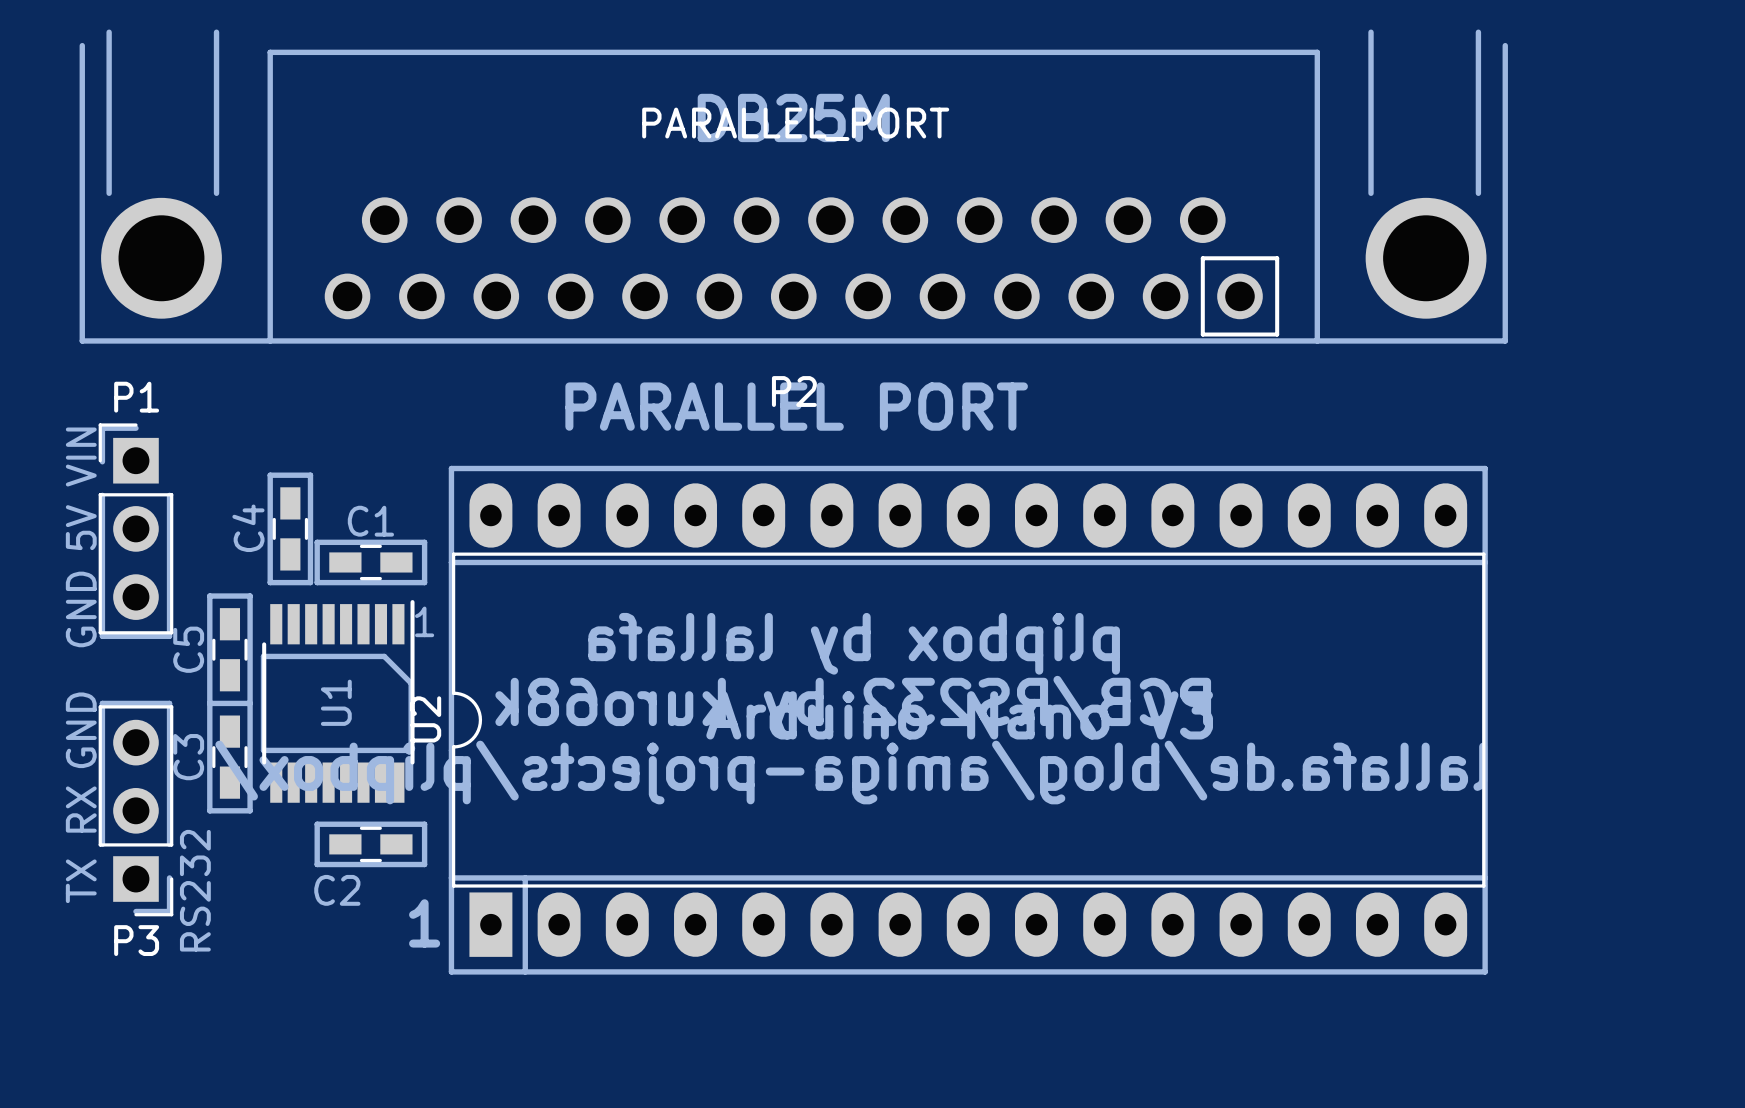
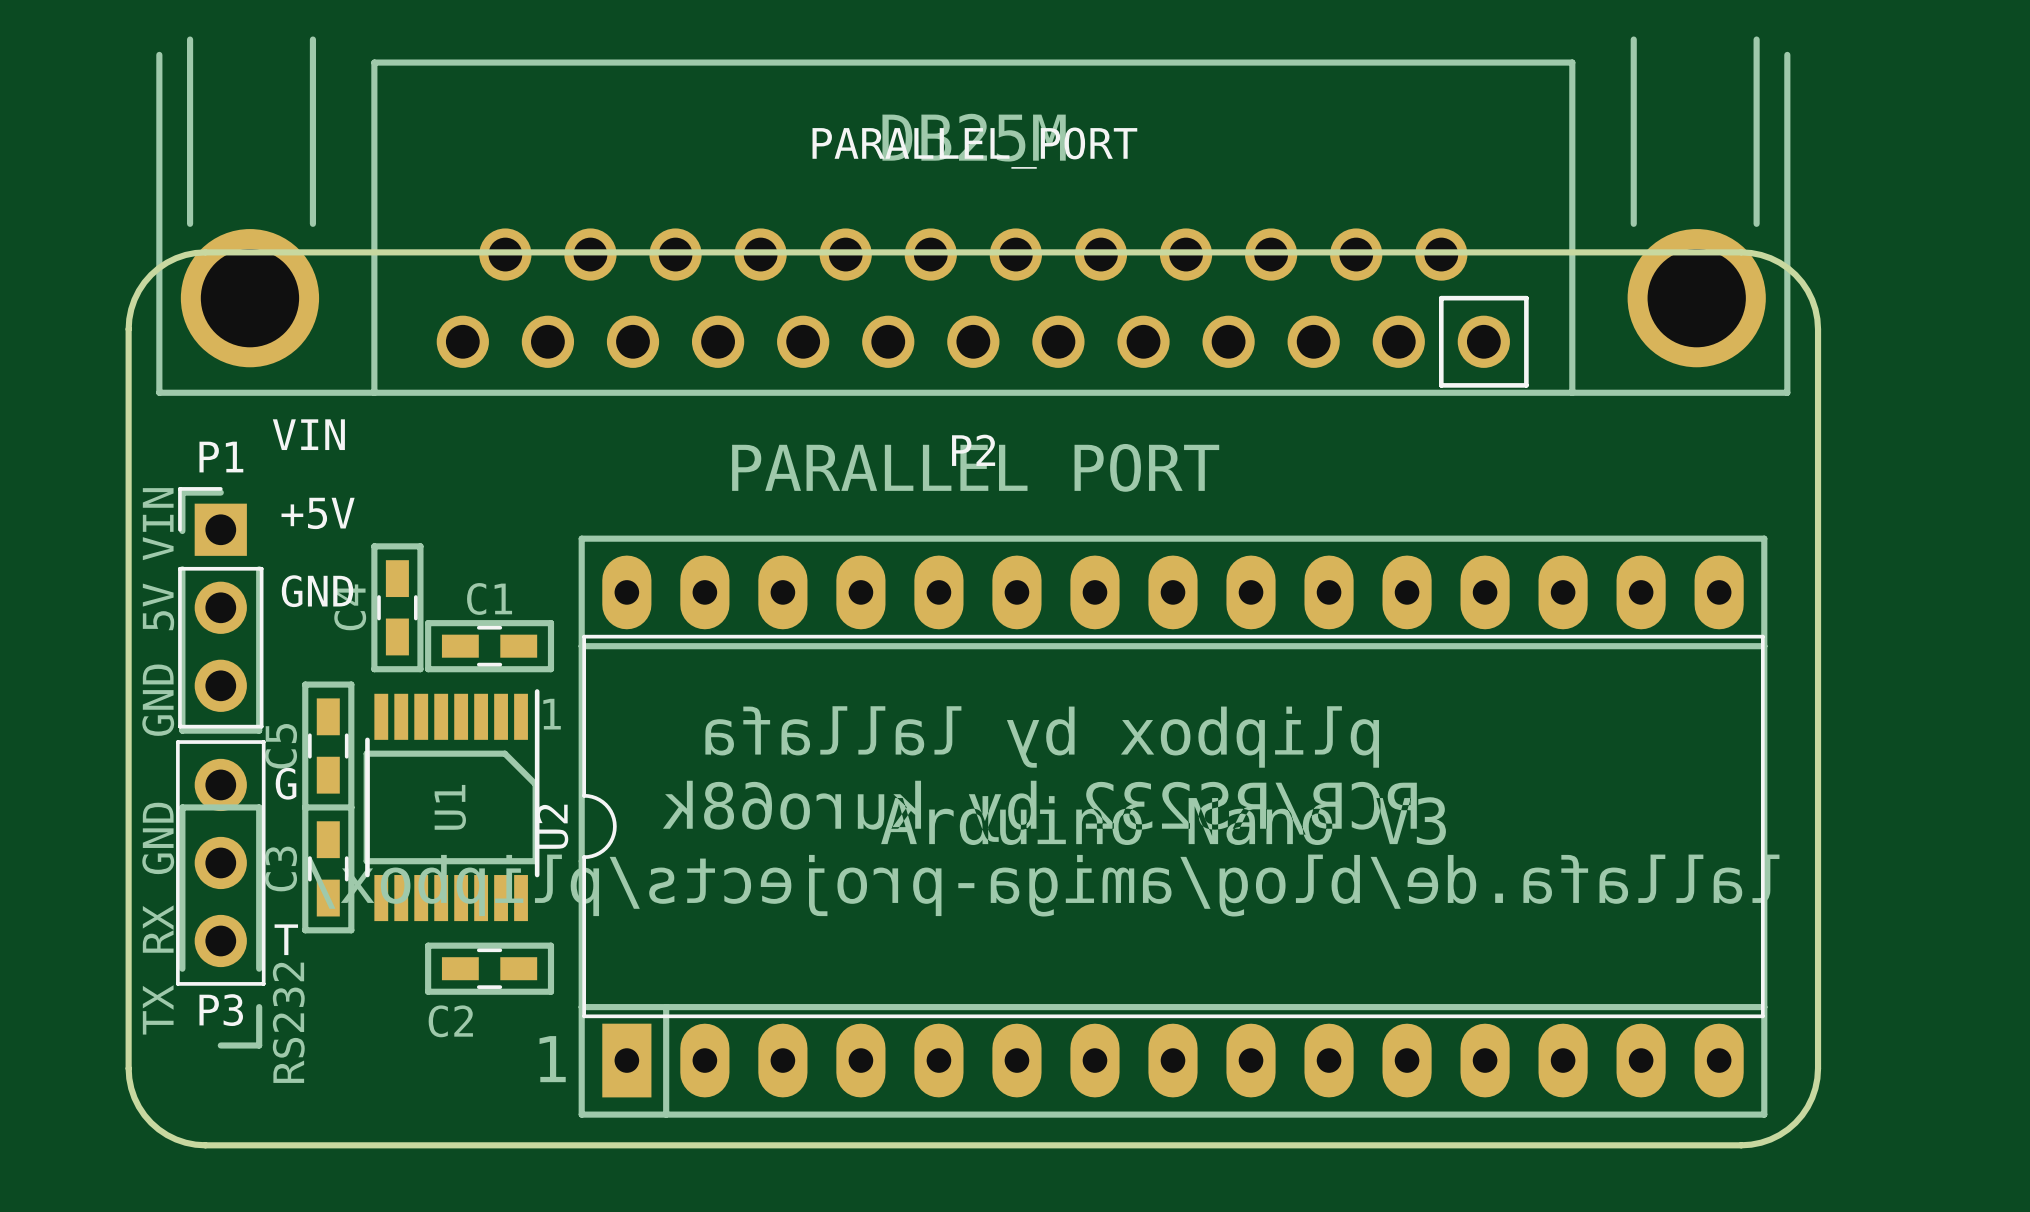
board edge: none -> (205, 252) (1741, 252) (1761, 254) (1779, 262) (1795, 274) (1807, 290) (1815, 309) (1818, 329) (1818, 1068) (1815, 1088) (1807, 1106) (1795, 1122) (1779, 1135) (1761, 1142) (1741, 1145) (205, 1145) (185, 1142) (167, 1135) (151, 1122) (138, 1106) (131, 1088) (128, 1068) (128, 329) (134, 299) (151, 274) (176, 258) (205, 252)
text: none -> VIN (308, 434)
text: none -> +5V (318, 513)
text: none -> GND (317, 591)
text: none -> G (286, 783)
P3 footprint: [98, 705, 174, 917] -> [176, 740, 266, 986]
text: none -> T (286, 939)

